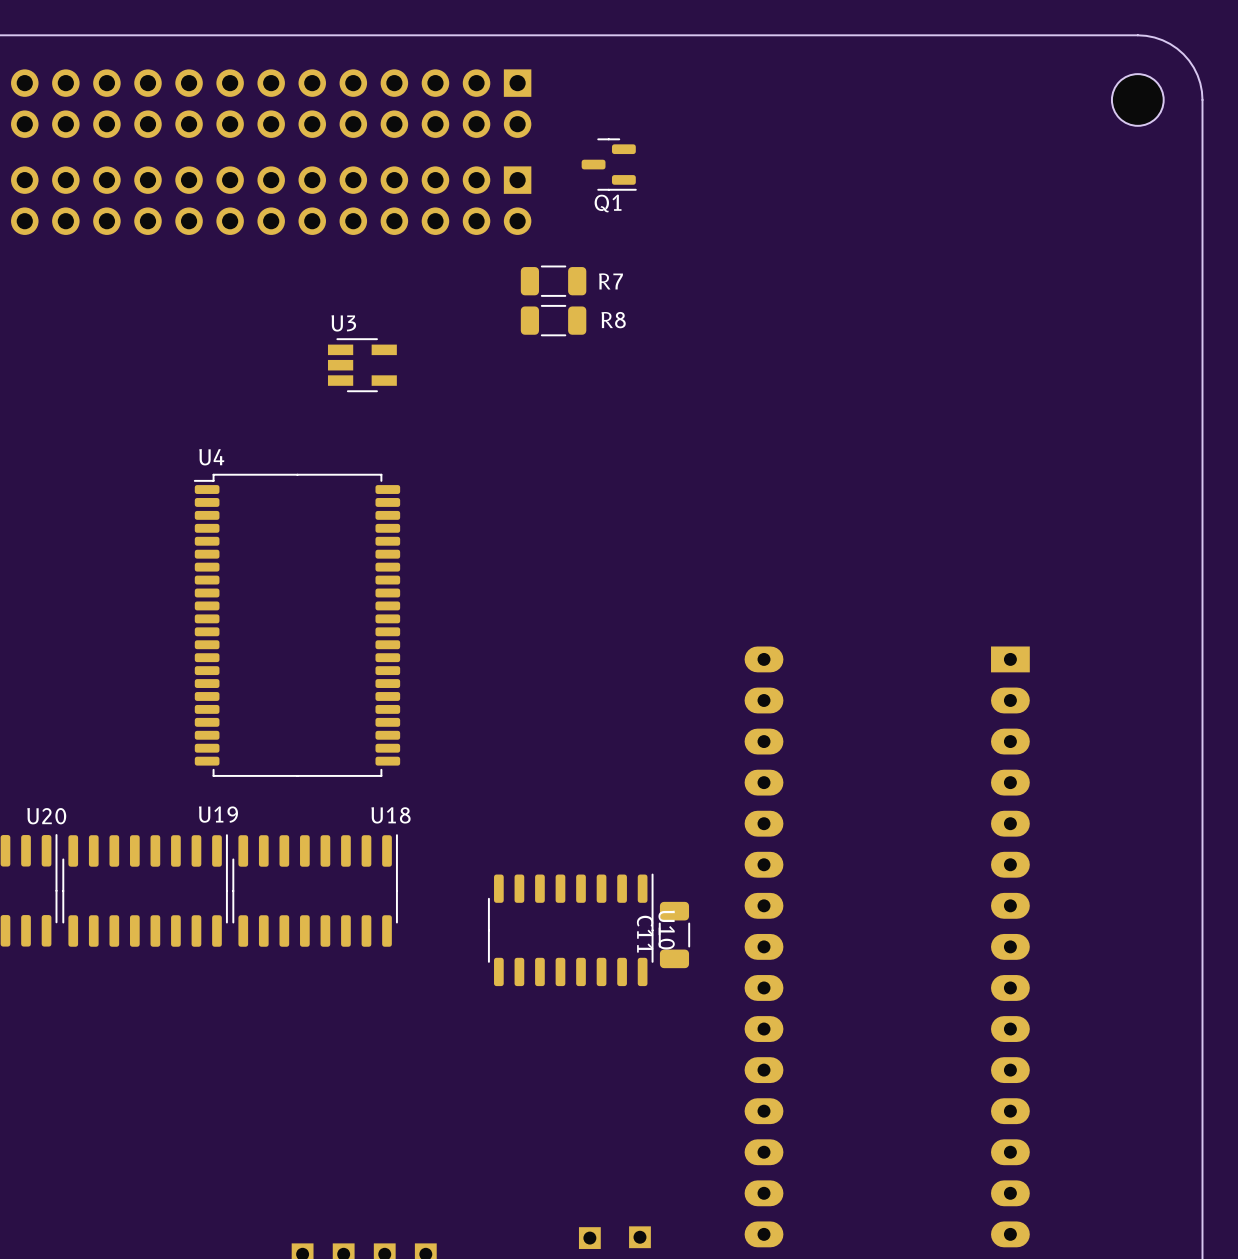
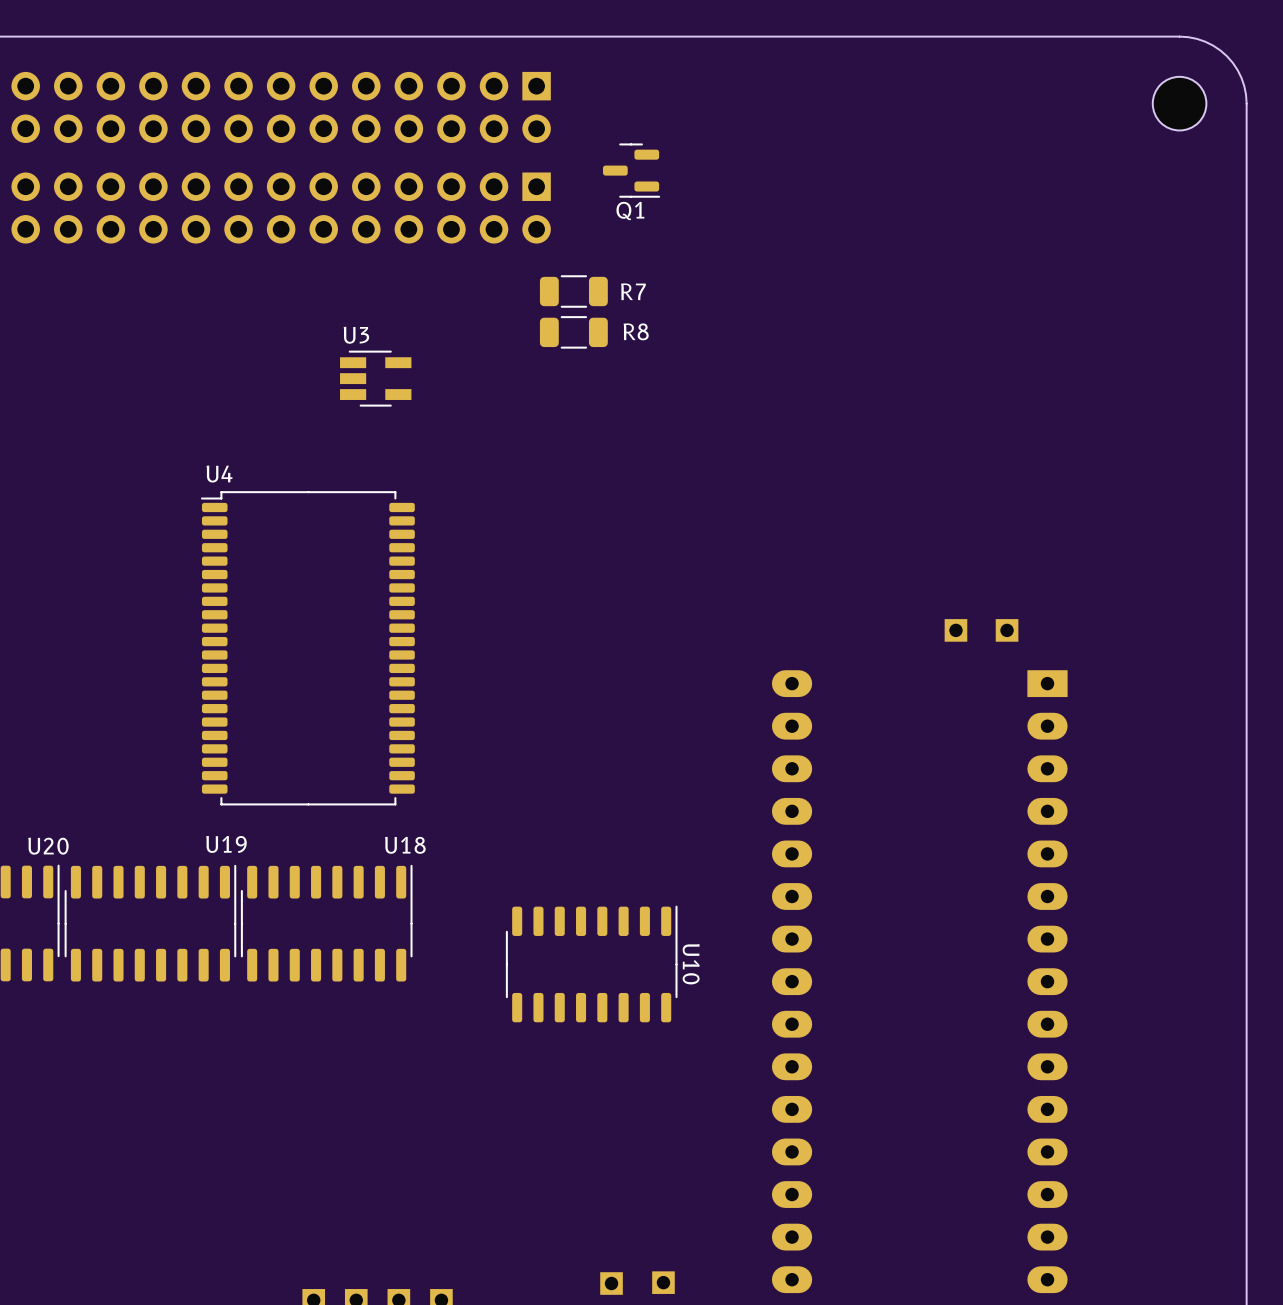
part: none -> (955, 630)
part: none -> (1007, 630)
C11: (674, 935) -> none

